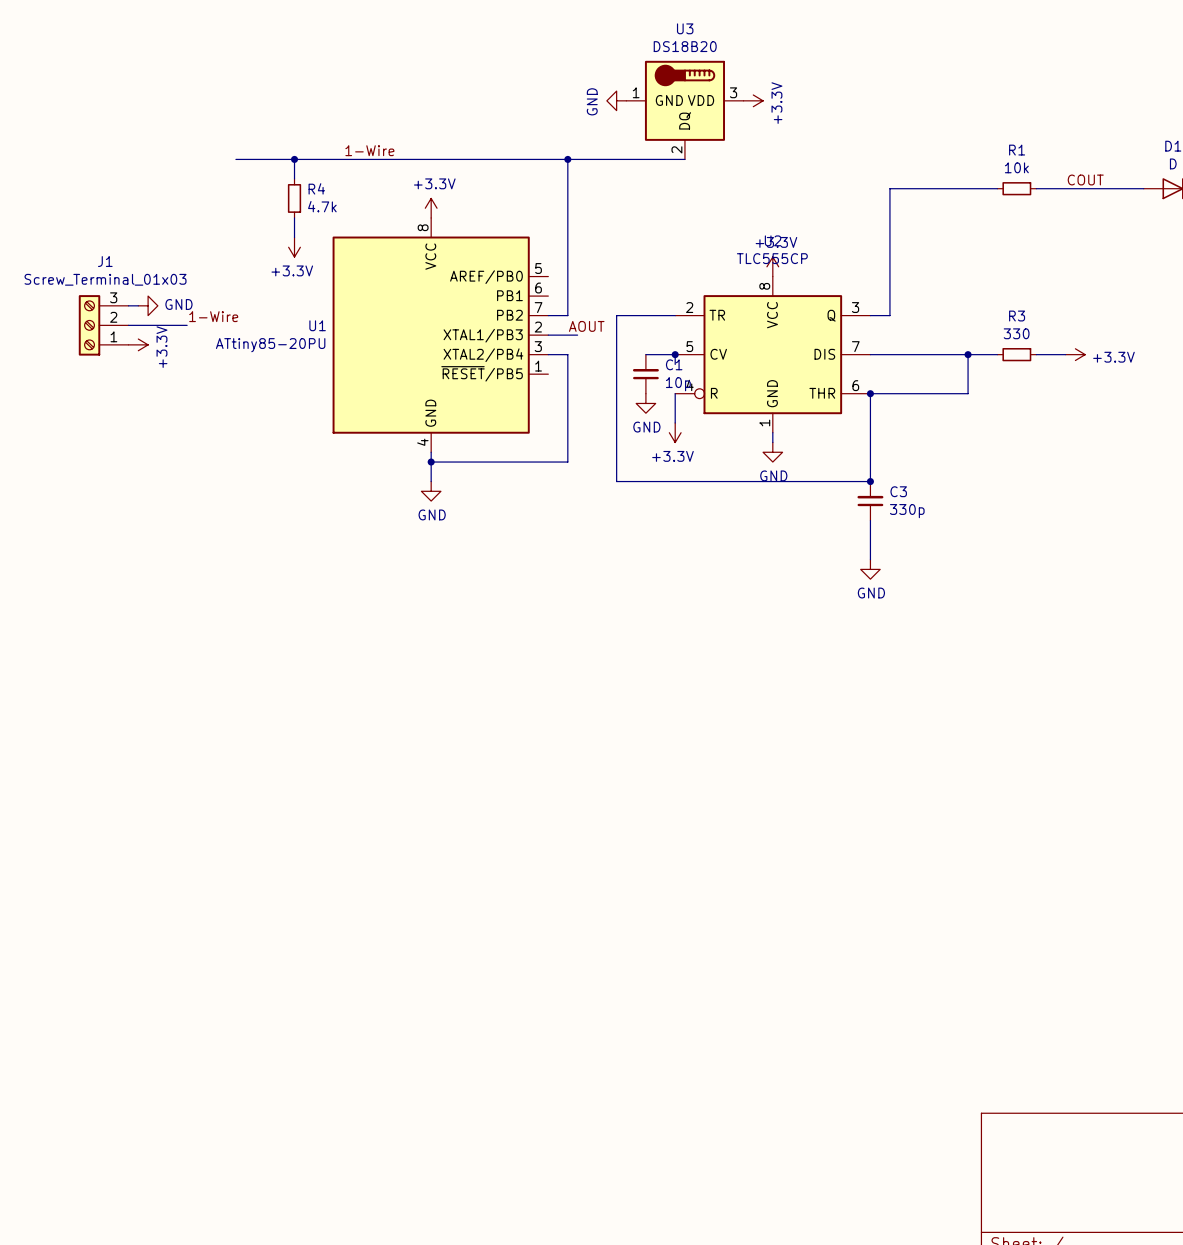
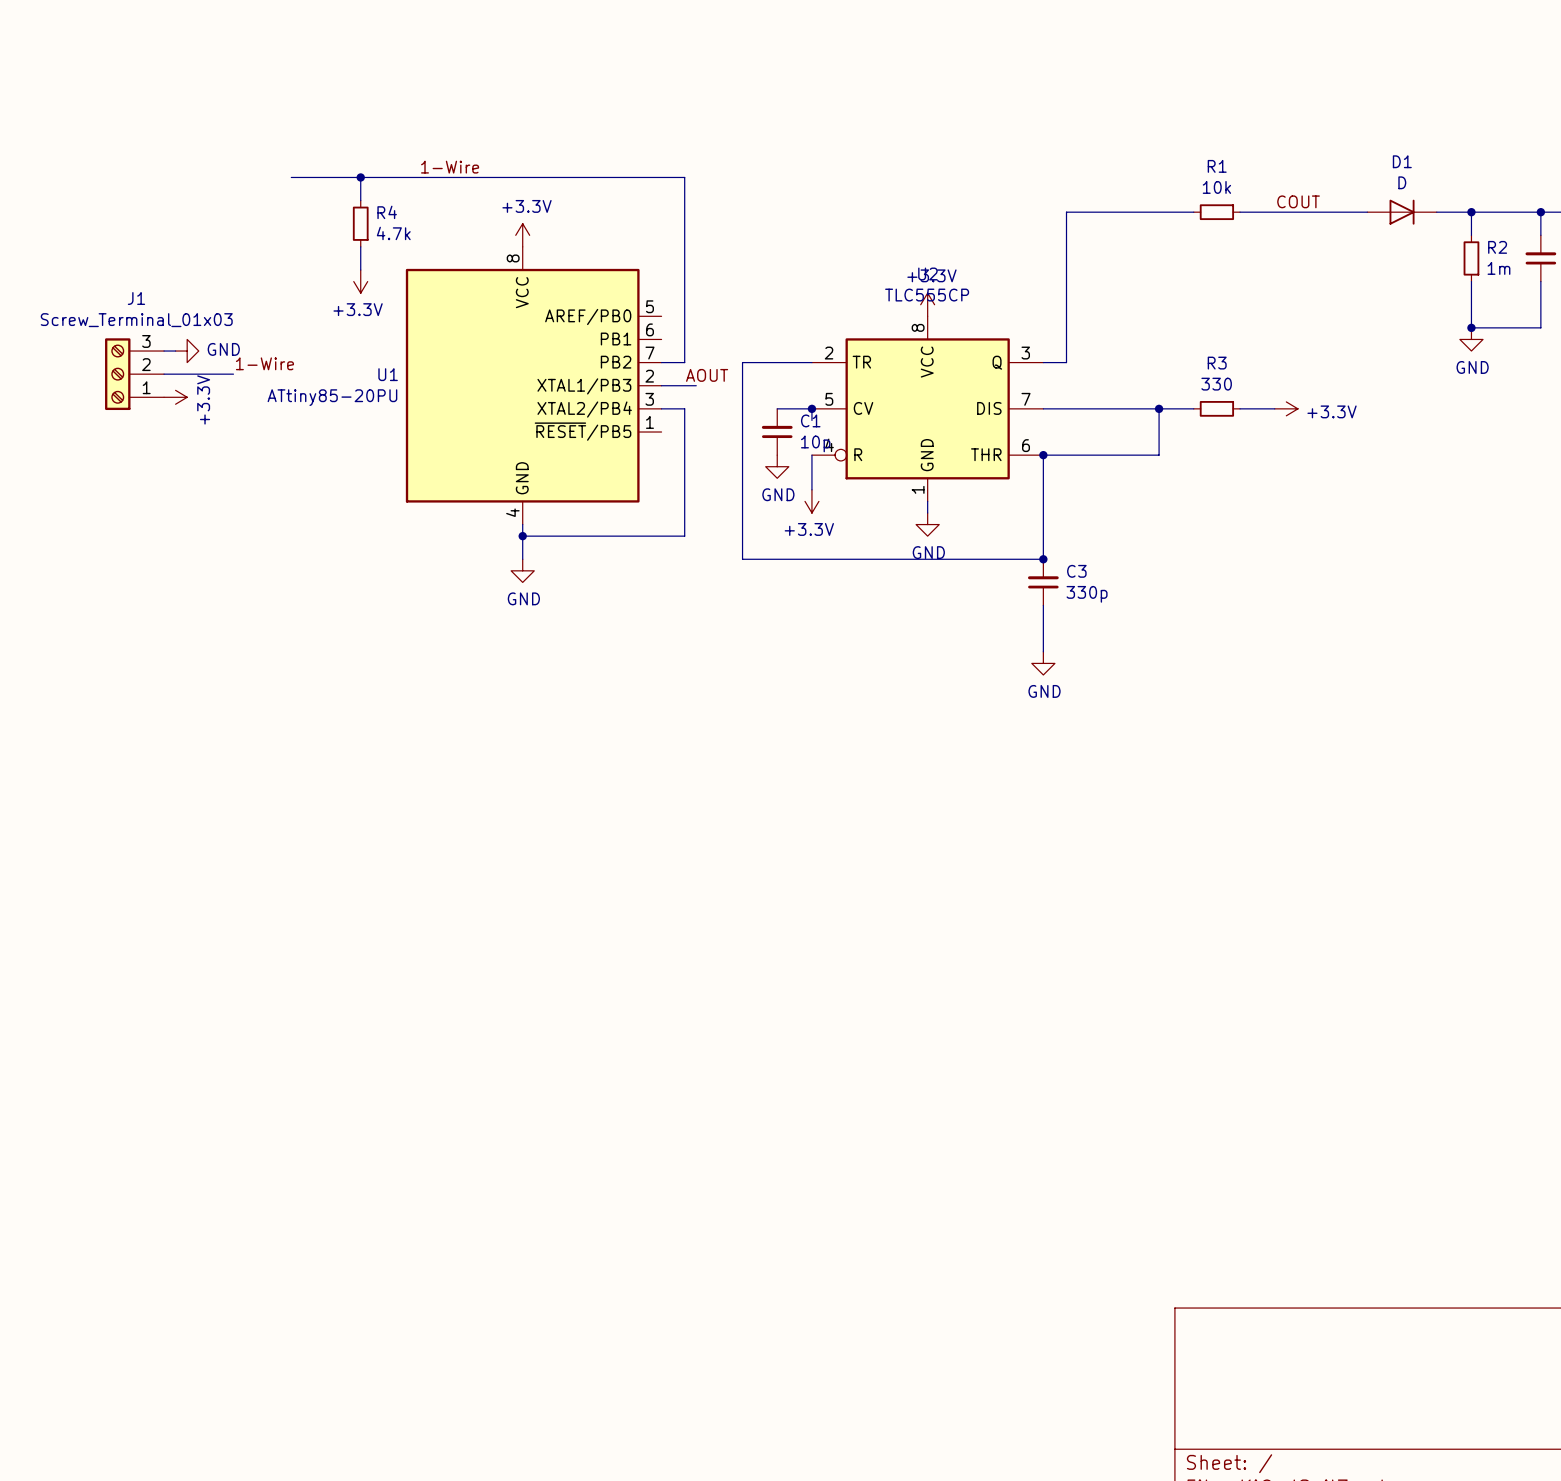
power symbol: GND (616, 100) -> none
power symbol: +3.3V (753, 100) -> none
U3: DS18B20 (684, 110) -> none
wire: (567, 159) (684, 159) -> none
junction: (567, 159) -> none

